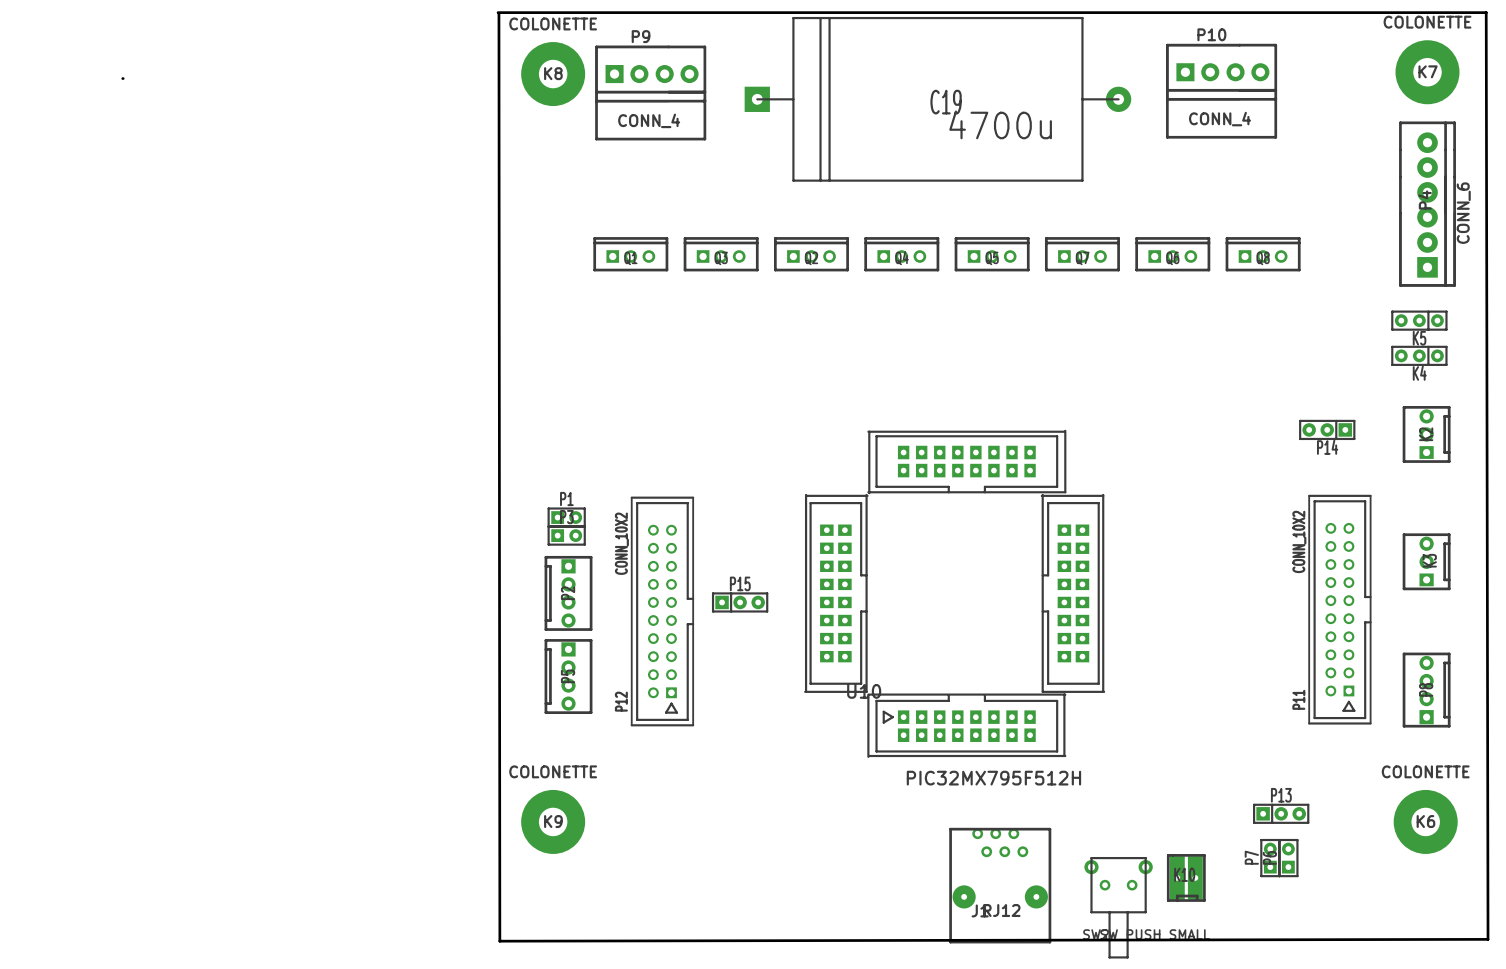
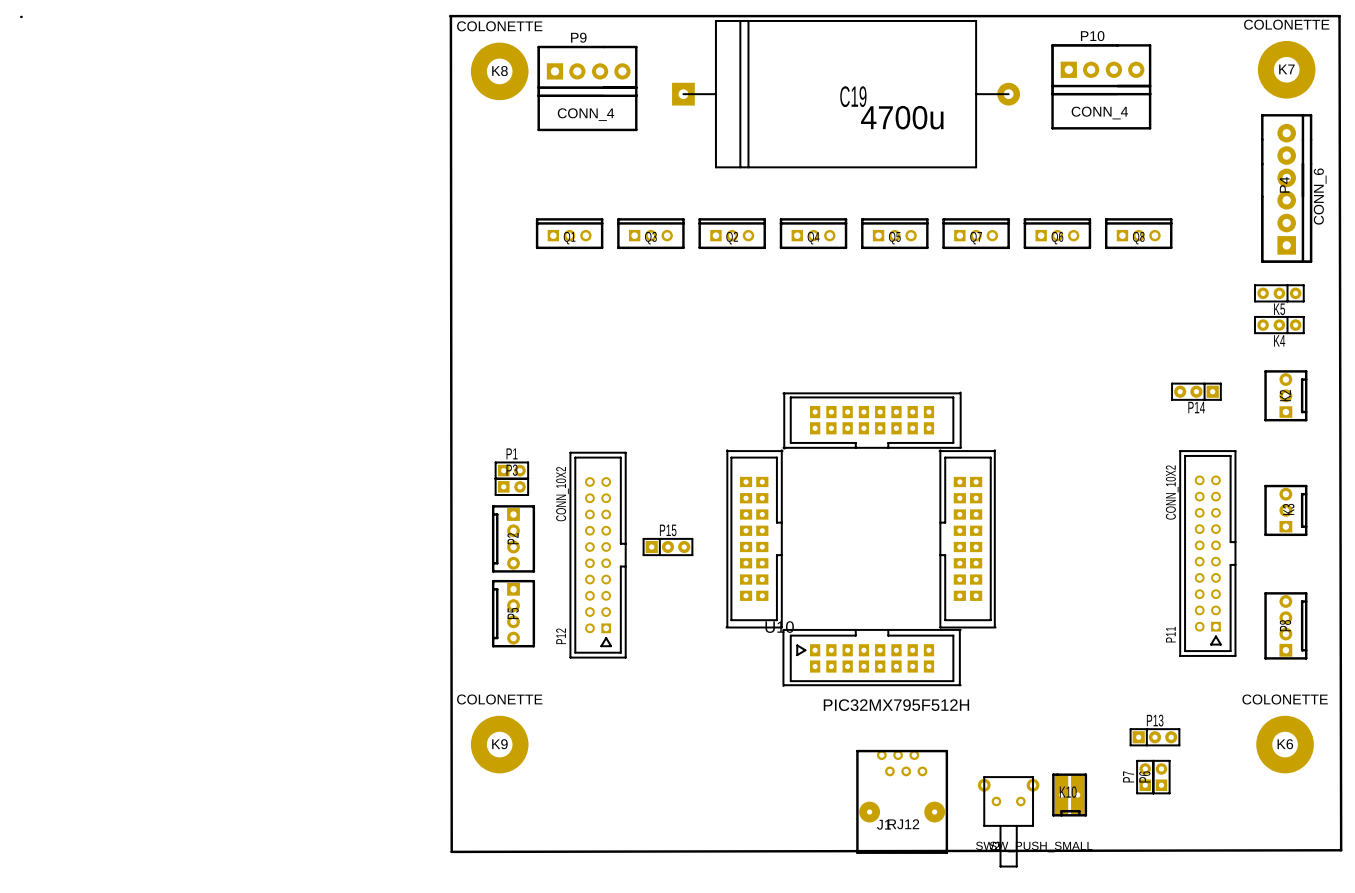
board edge: (122, 78) (123, 78) -> (21, 16) (21, 16)

